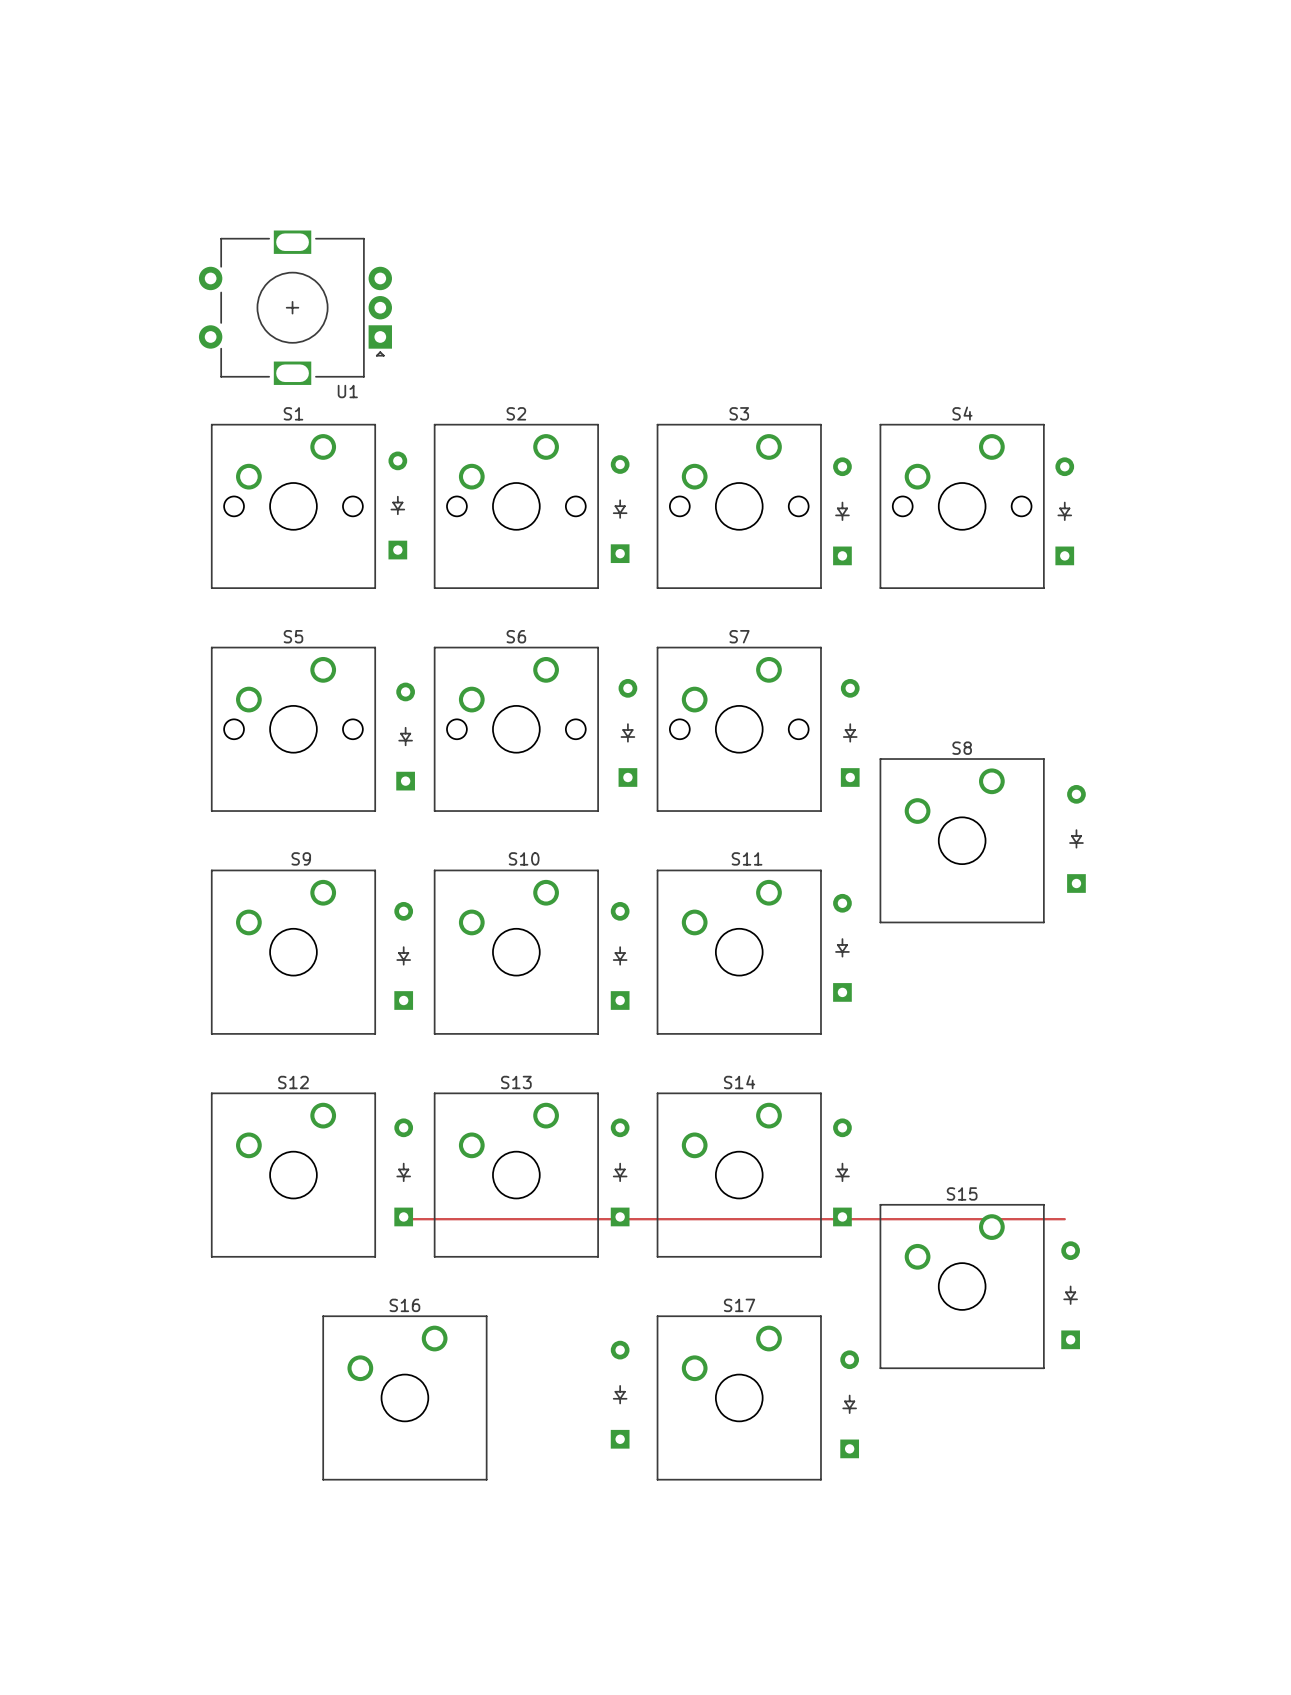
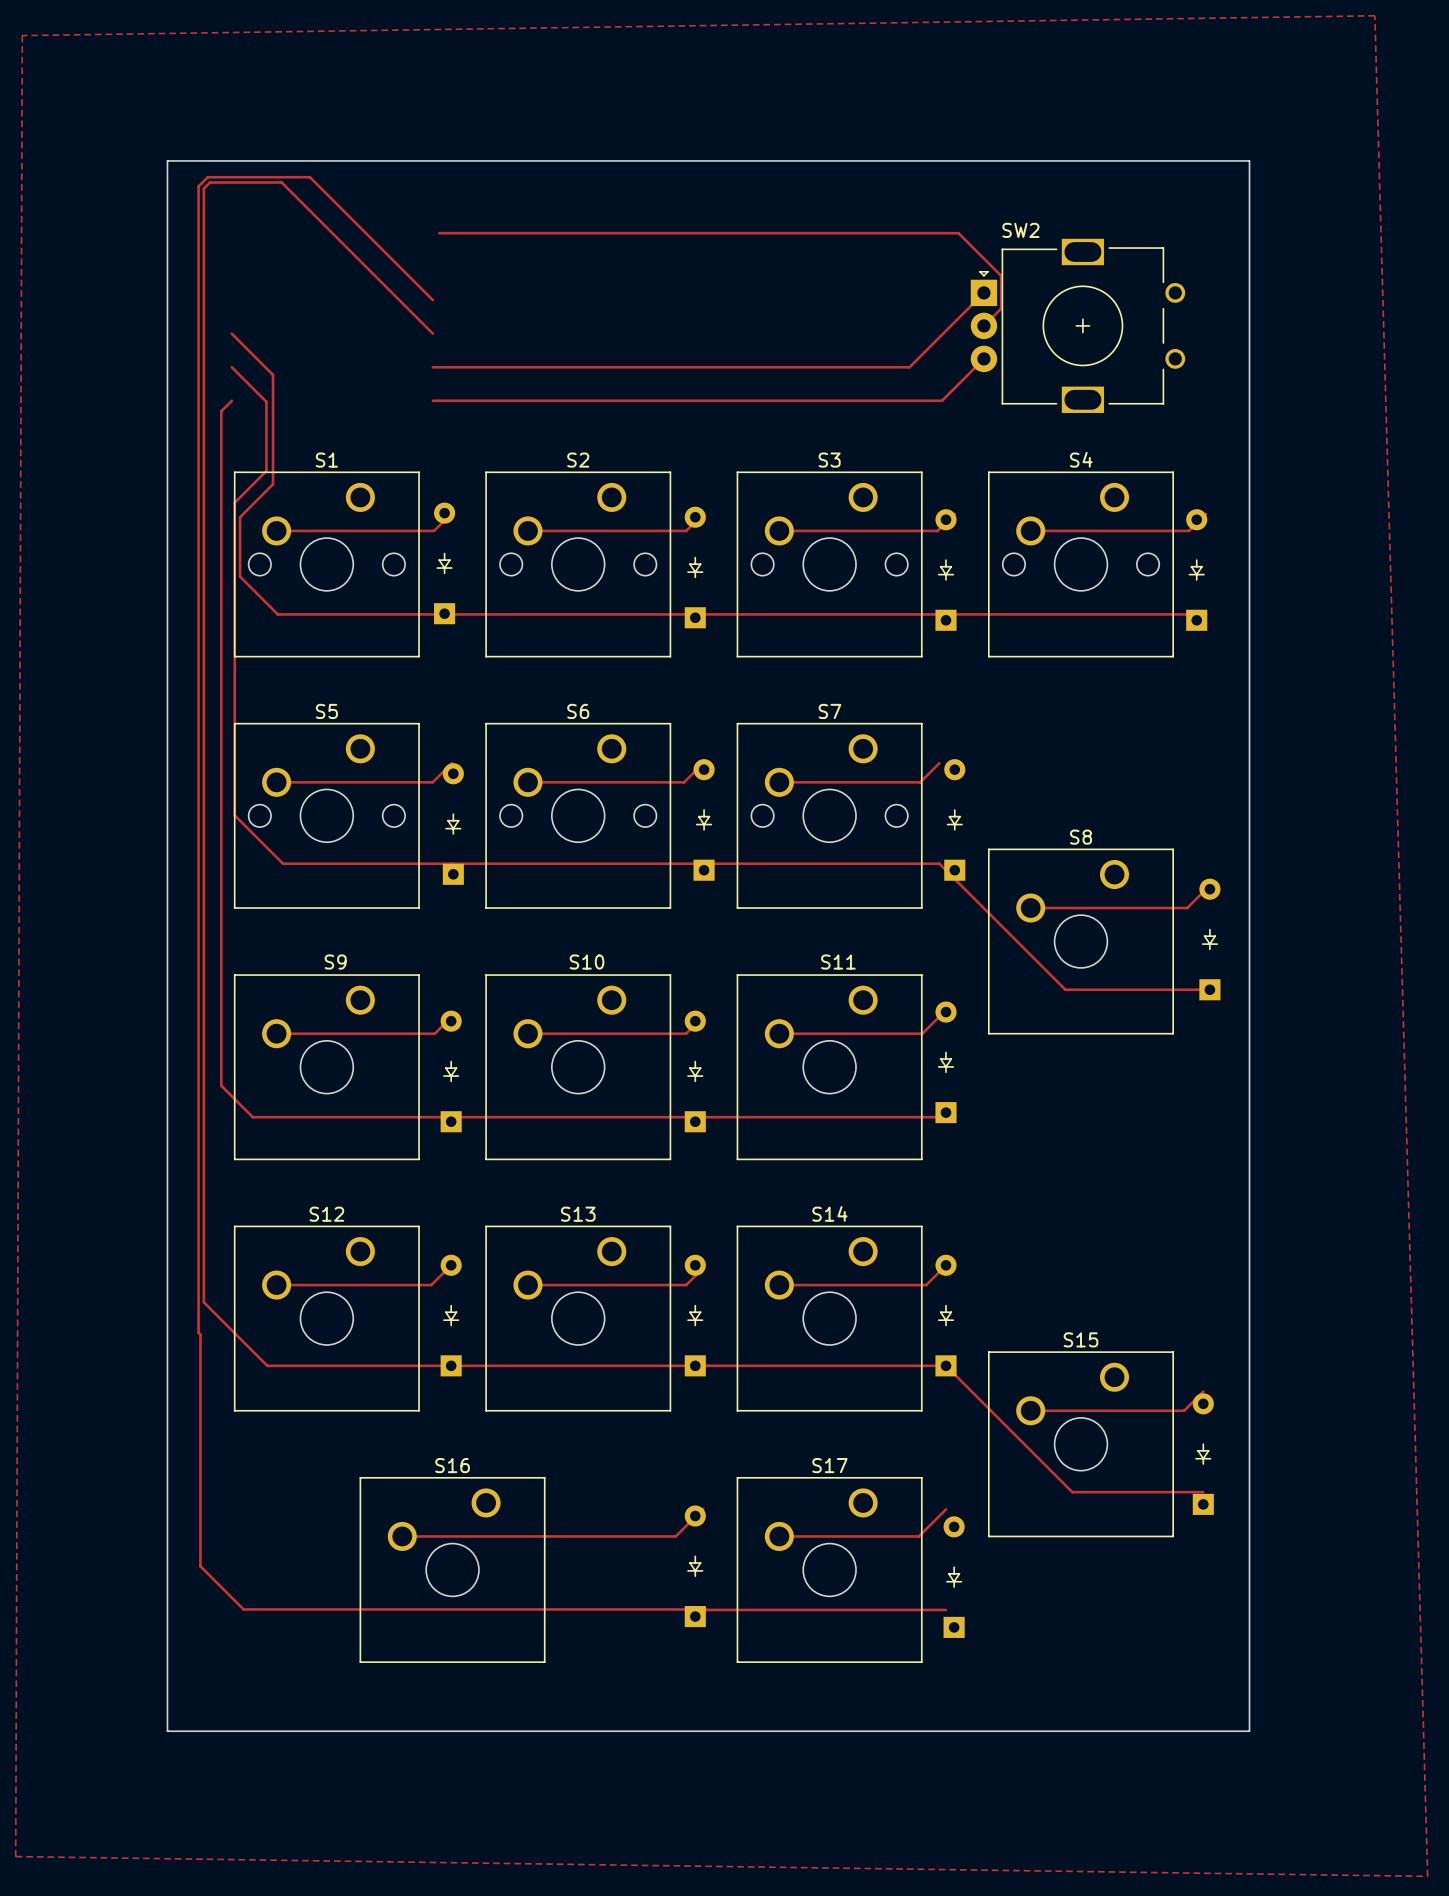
zone outline: none -> (1374, 15) (1427, 1876) (15, 1856) (22, 35) (1374, 15)
board edge: none -> (167, 160) (1249, 160) (1249, 1731) (167, 1731) (167, 160)
track: none -> (439, 233) (958, 233) (1001, 275) (1001, 308) (983, 325)
track: none -> (983, 292) (909, 367) (432, 367)
track: none -> (432, 300) (309, 177) (207, 177) (198, 186) (198, 1332) (200, 1334) (200, 1566) (243, 1609) (946, 1609)
SW2: none -> (1077, 325)
track: none -> (231, 333) (273, 374) (273, 484) (240, 517) (240, 576) (277, 614) (1205, 614)
track: none -> (432, 333) (281, 182) (209, 182) (203, 188) (203, 1302) (267, 1365) (946, 1365) (1072, 1492) (1203, 1492)
U1: (295, 307) -> none
track: none -> (983, 358) (942, 400) (432, 400)
track: none -> (231, 367) (266, 401) (266, 471) (234, 502) (234, 815) (283, 863) (939, 863) (1065, 989) (1206, 989)
track: none -> (231, 400) (221, 411) (221, 1085) (252, 1117) (939, 1117)
track: none -> (451, 513) (434, 530) (276, 530)
track: none -> (703, 513) (686, 530) (527, 530)
track: none -> (954, 513) (937, 530) (779, 530)
track: none -> (1206, 513) (1188, 530) (1030, 530)
track: none -> (451, 763) (432, 782) (276, 782)
track: none -> (703, 763) (684, 782) (527, 782)
track: none -> (939, 763) (920, 782) (779, 782)
track: none -> (1206, 889) (1187, 908) (1030, 908)
track: none -> (451, 1016) (434, 1033) (276, 1033)
track: none -> (703, 1016) (686, 1033) (527, 1033)
track: none -> (939, 1016) (922, 1033) (779, 1033)
track: none -> (451, 1265) (431, 1285) (276, 1285)
track: none -> (946, 1265) (926, 1285) (779, 1285)
track: none -> (703, 1268) (686, 1285) (527, 1285)
track: (397, 1219) (1064, 1219) -> none
track: none -> (1203, 1391) (1184, 1410) (1030, 1410)
track: none -> (703, 1508) (675, 1536) (402, 1536)
track: none -> (946, 1509) (918, 1536) (779, 1536)

